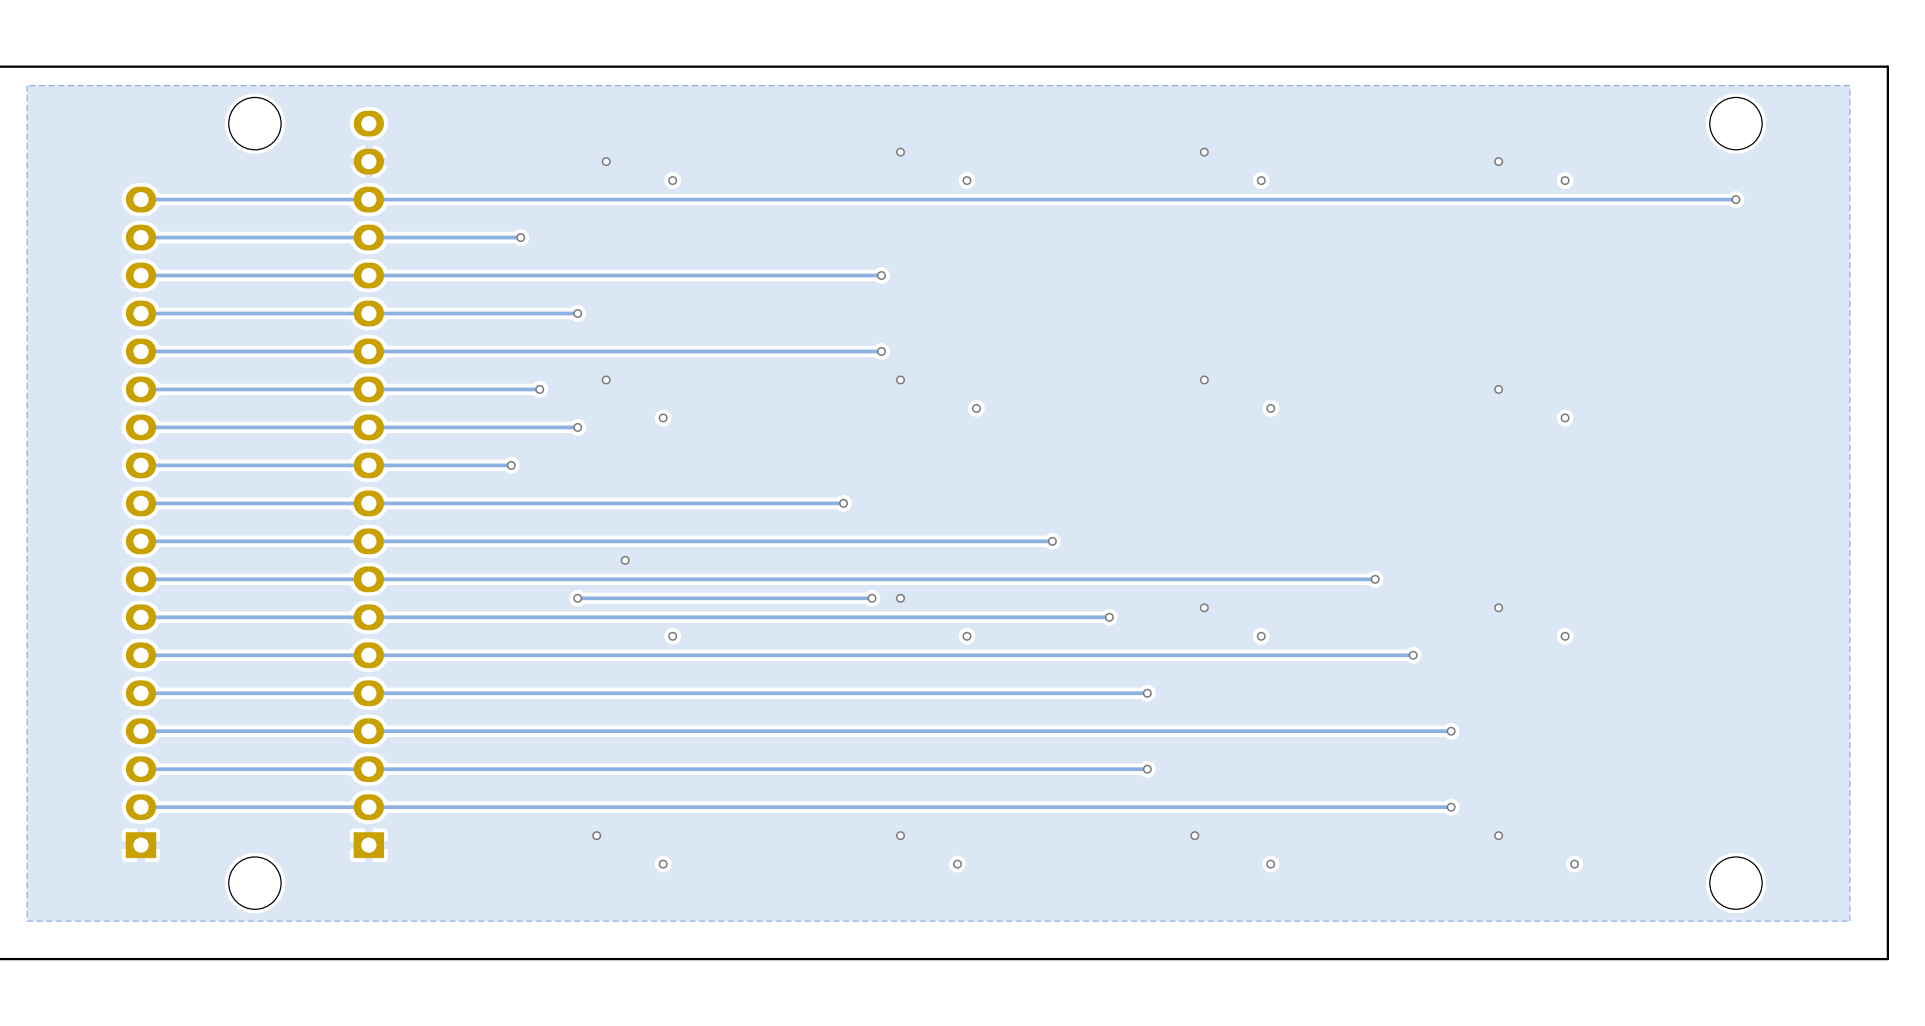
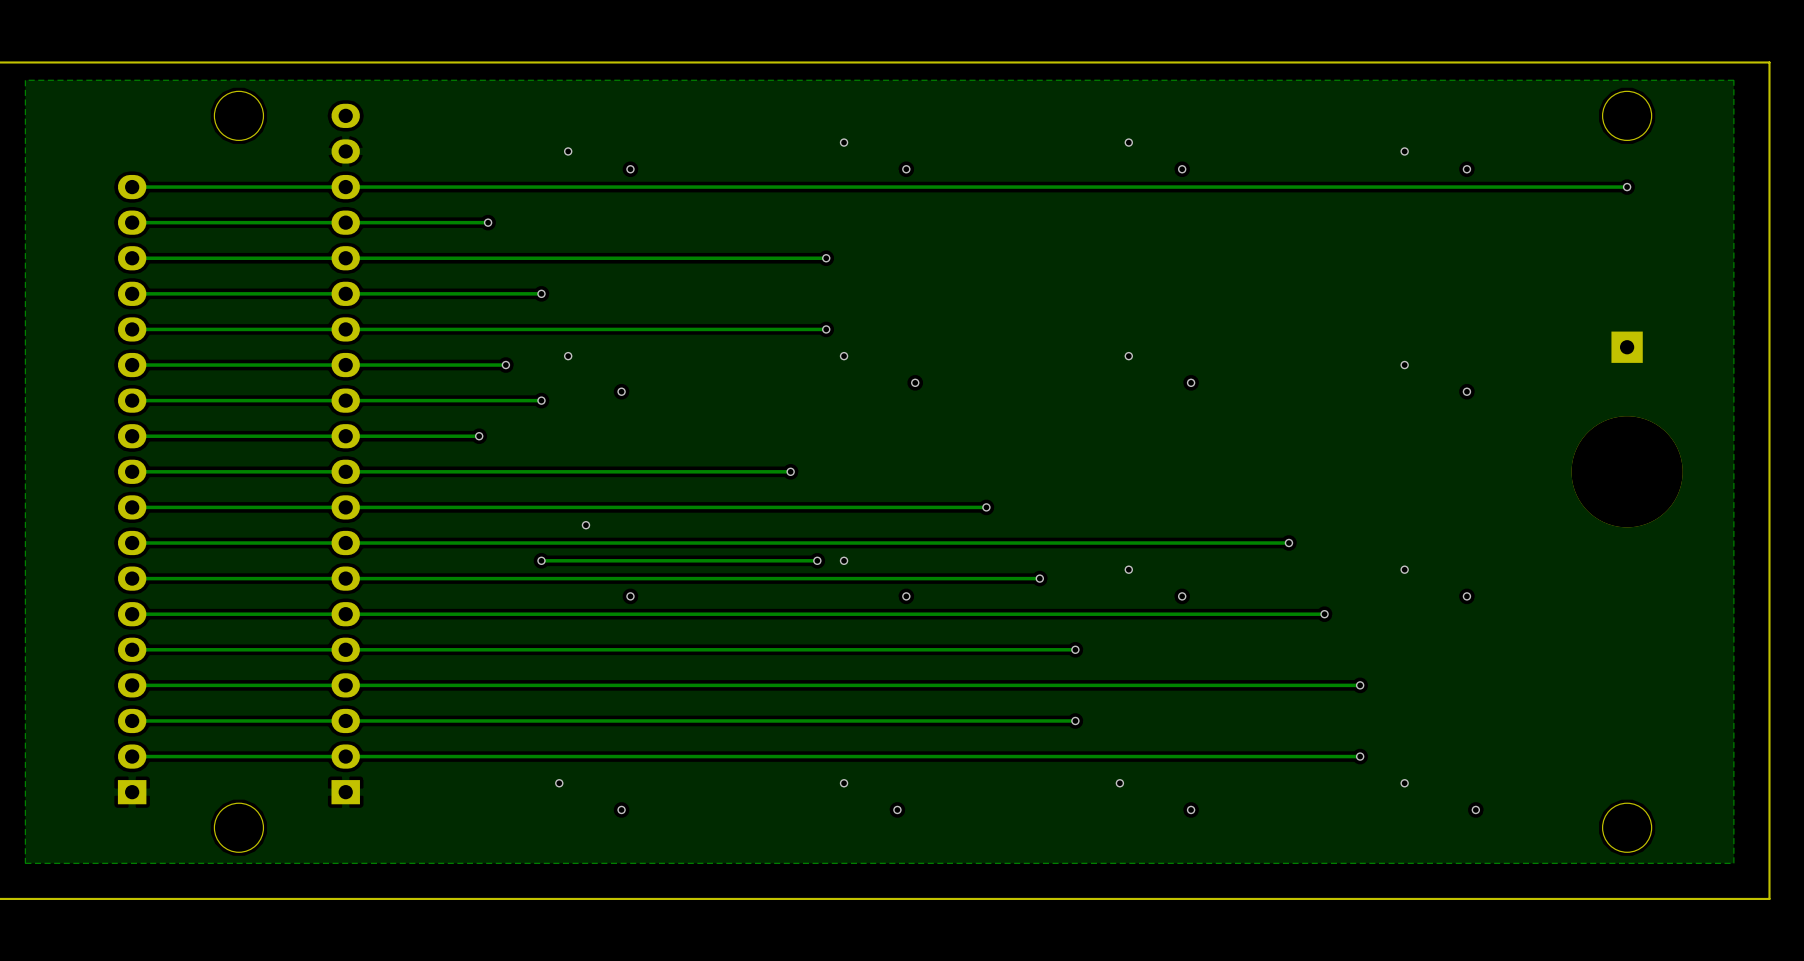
part: none -> (1627, 347)
part: none -> (1627, 471)

